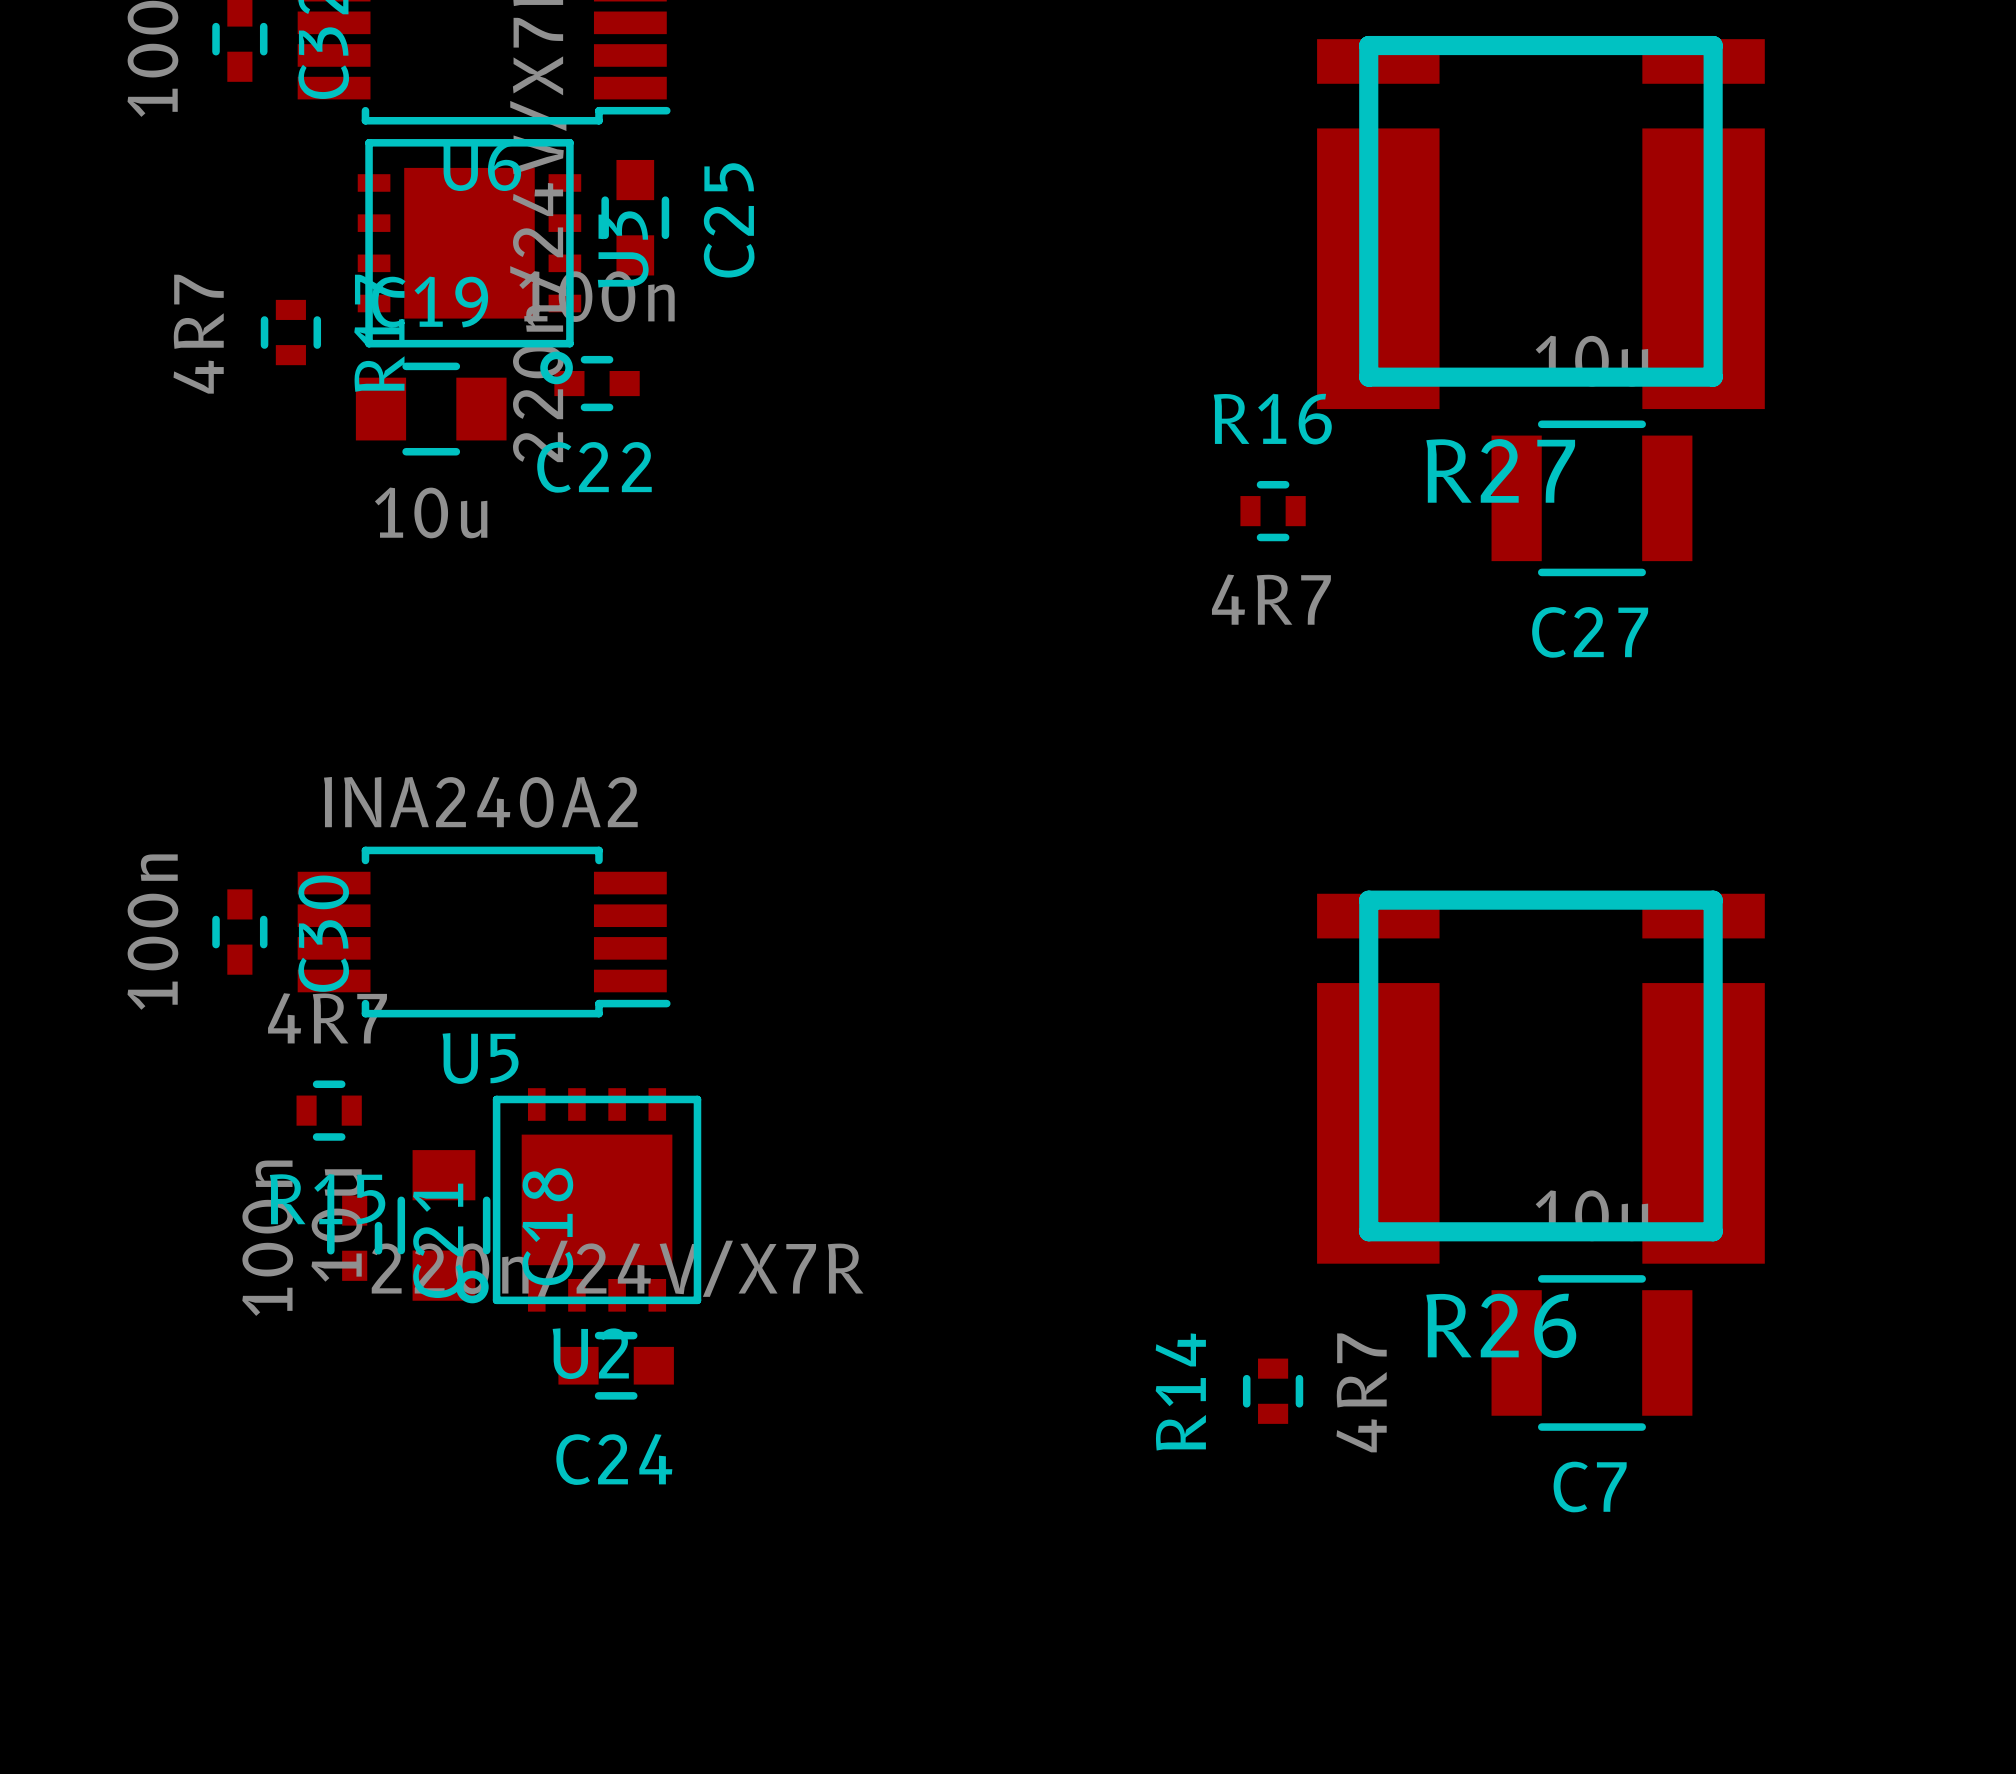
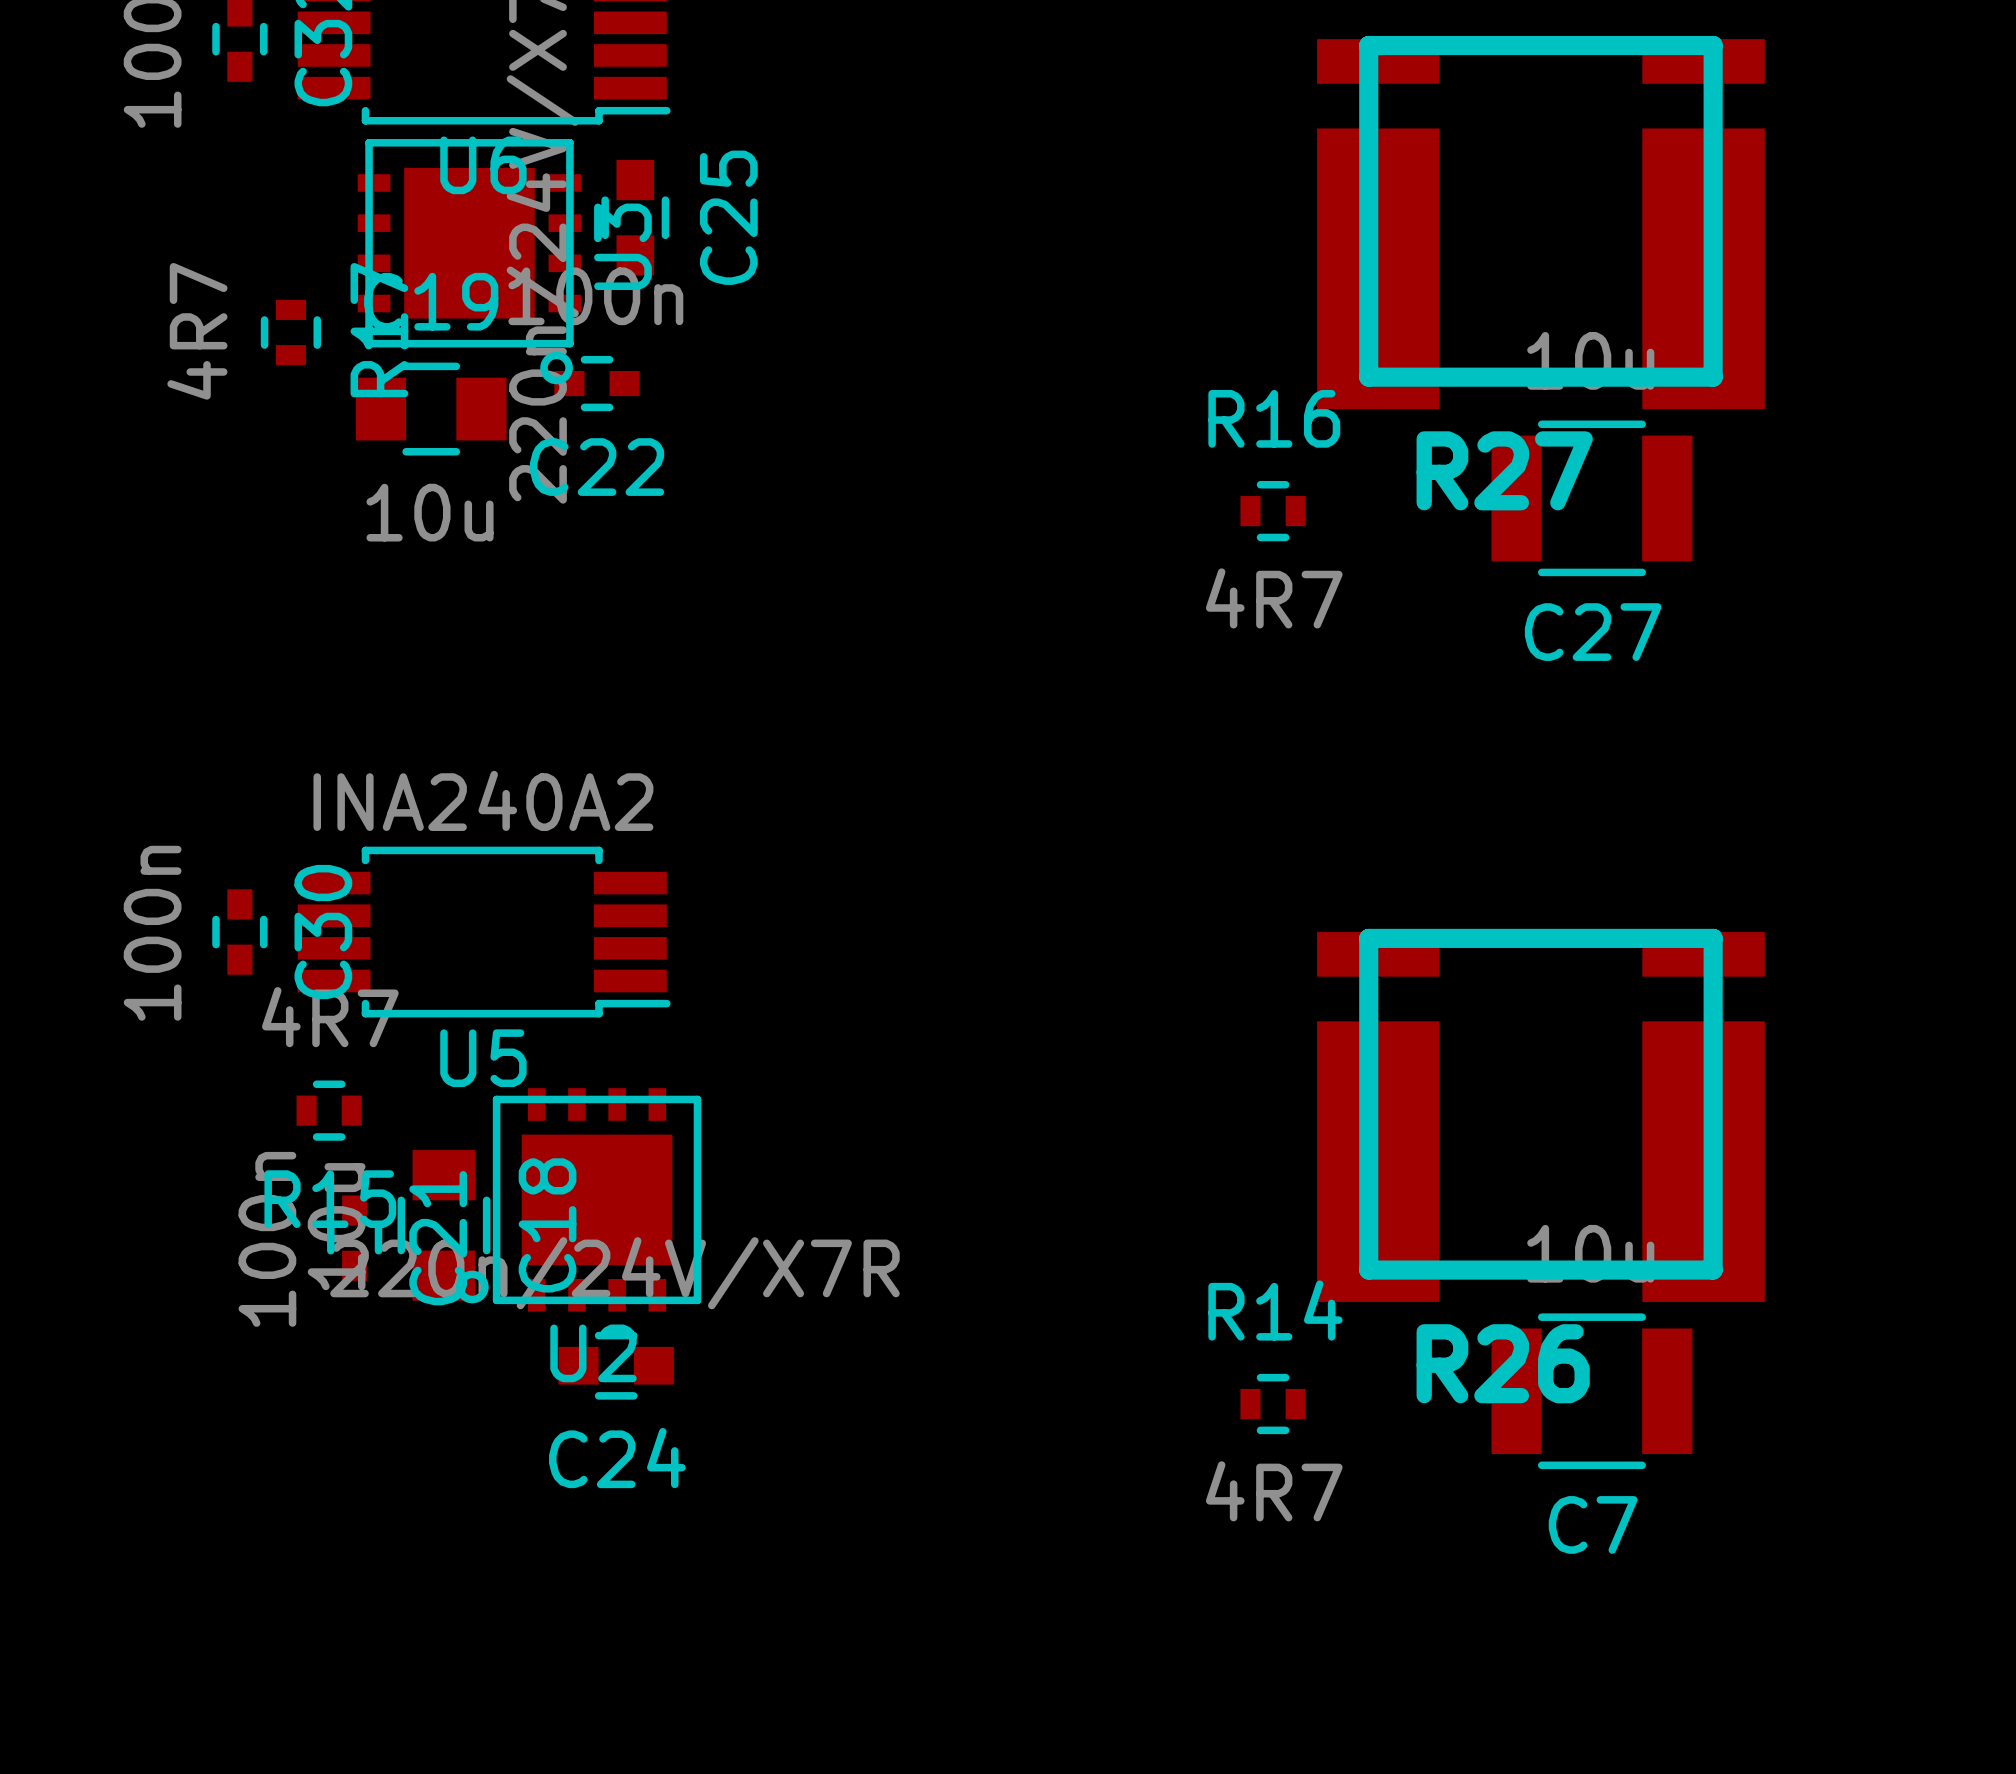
R26 position: (1540, 1077) -> (1540, 1115)
C7 position: (1591, 1352) -> (1591, 1391)
R14 rotation: 0° (1273, 1391) -> 90° clockwise (1273, 1403)

